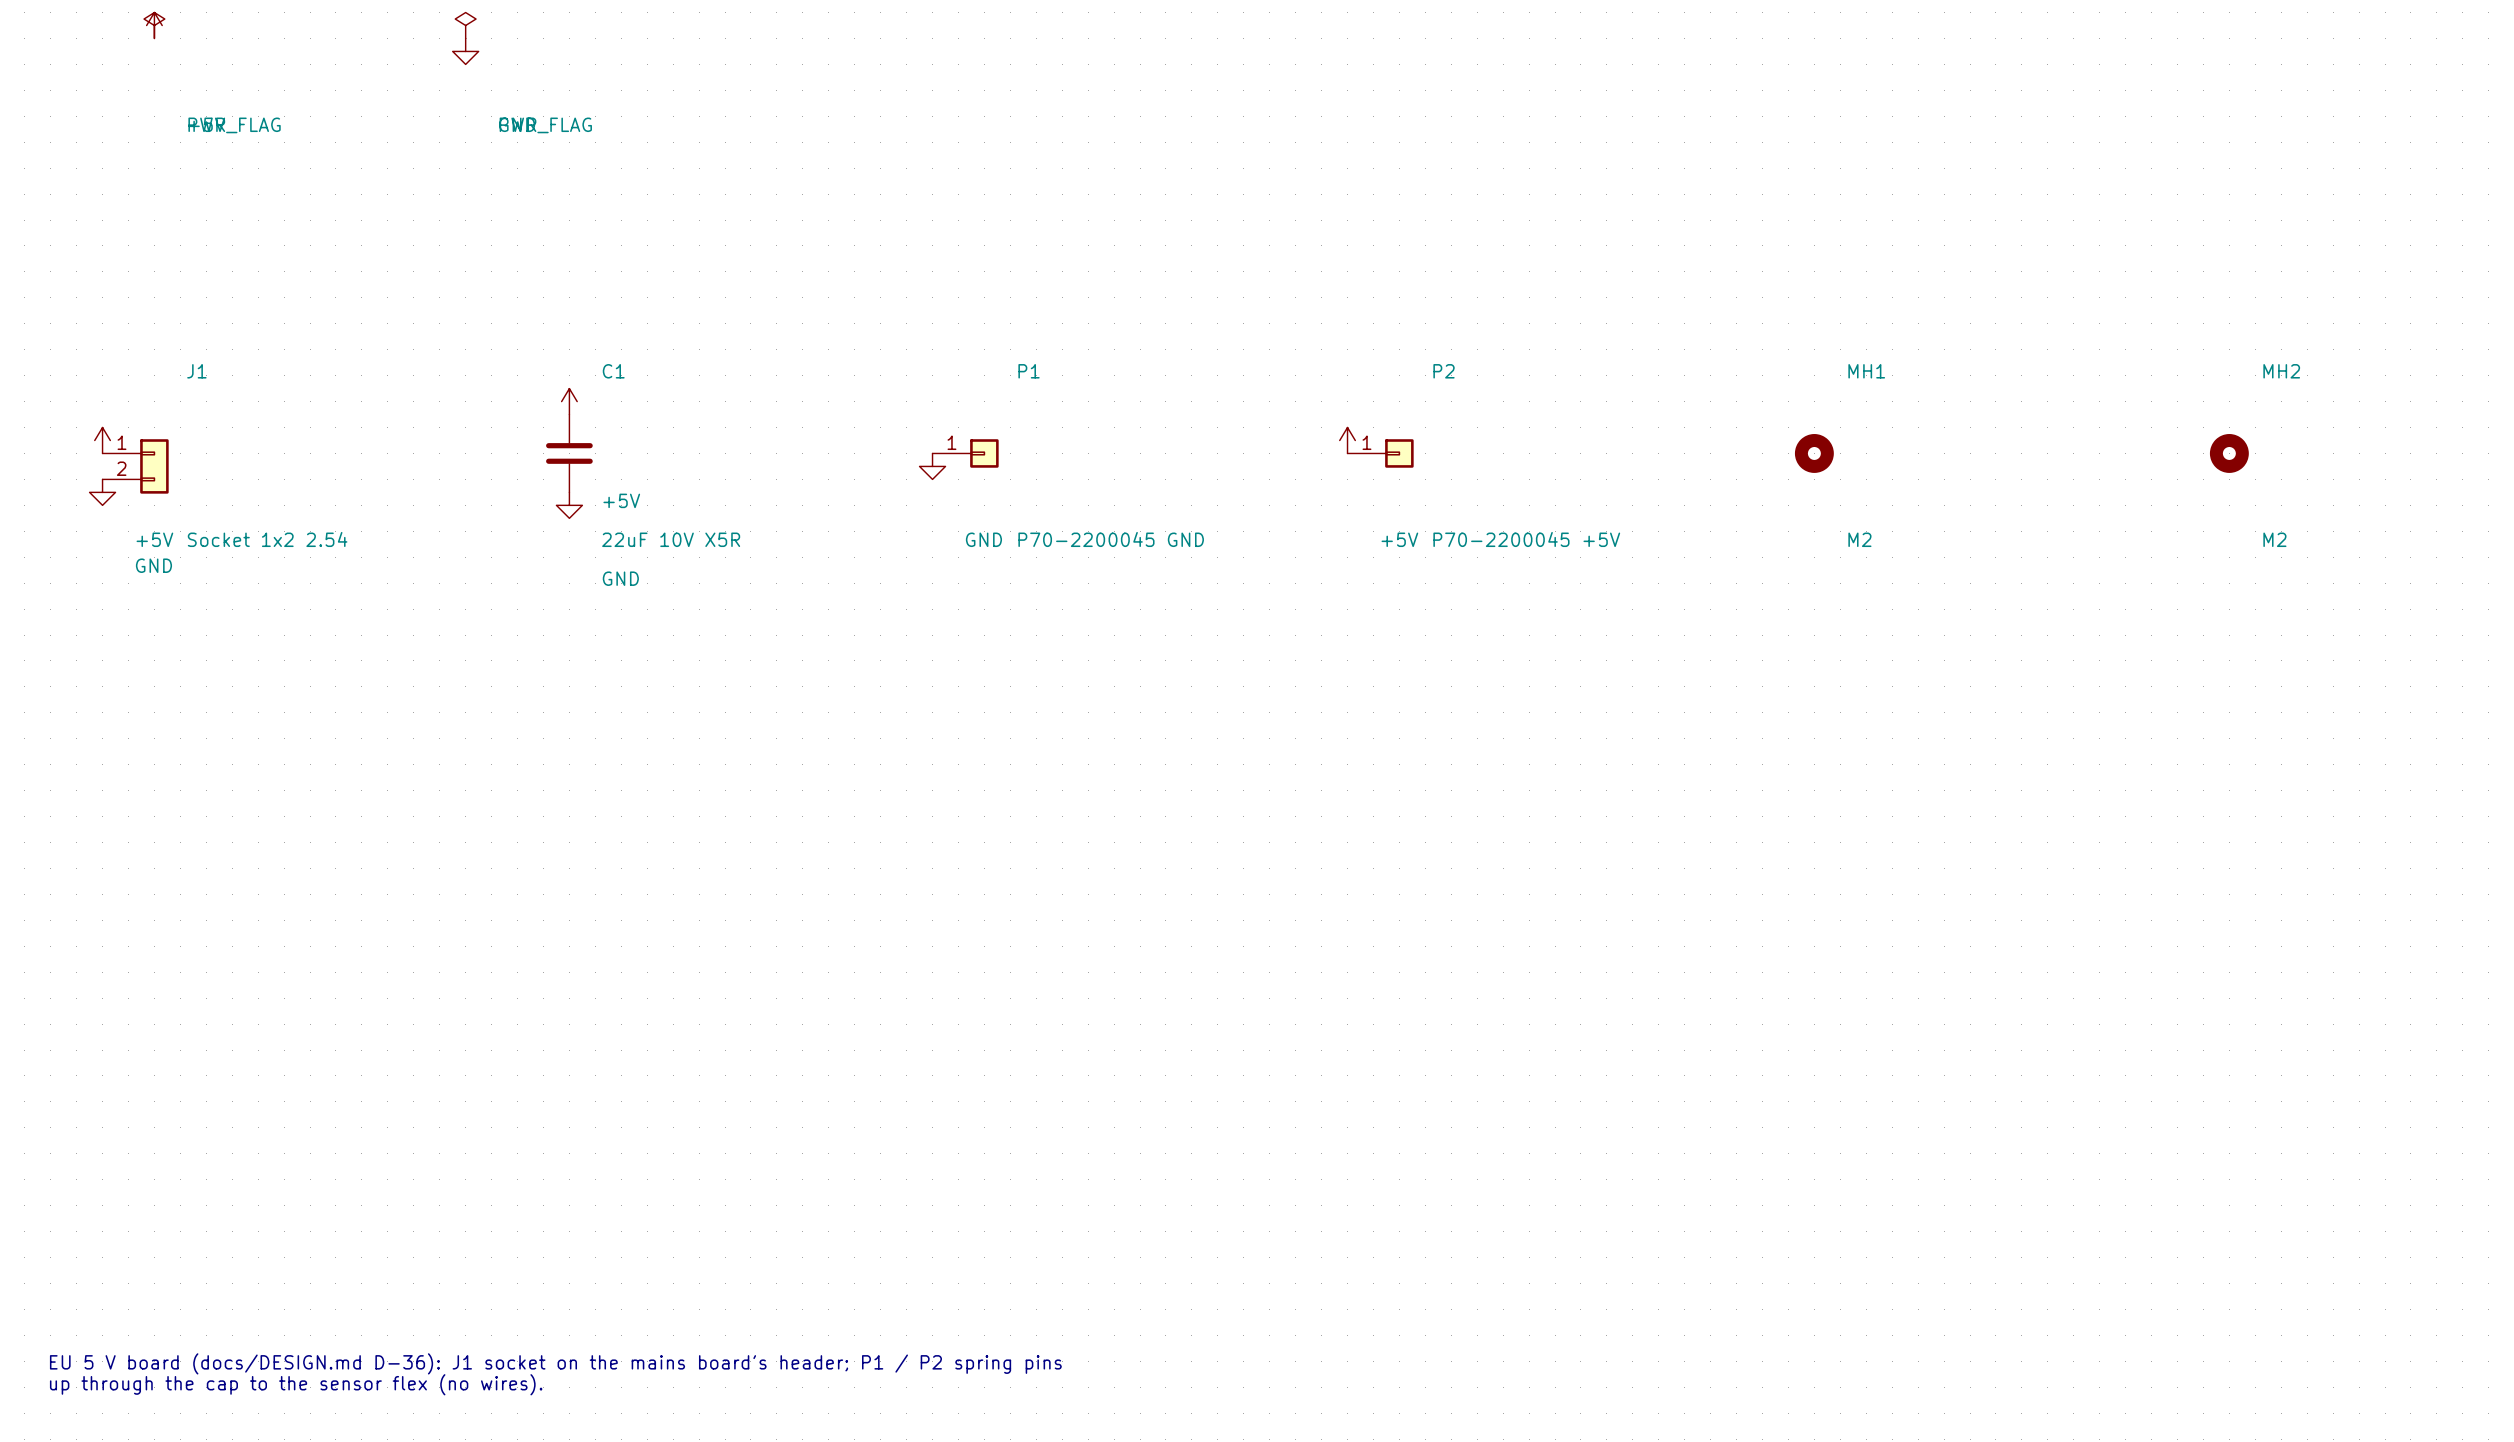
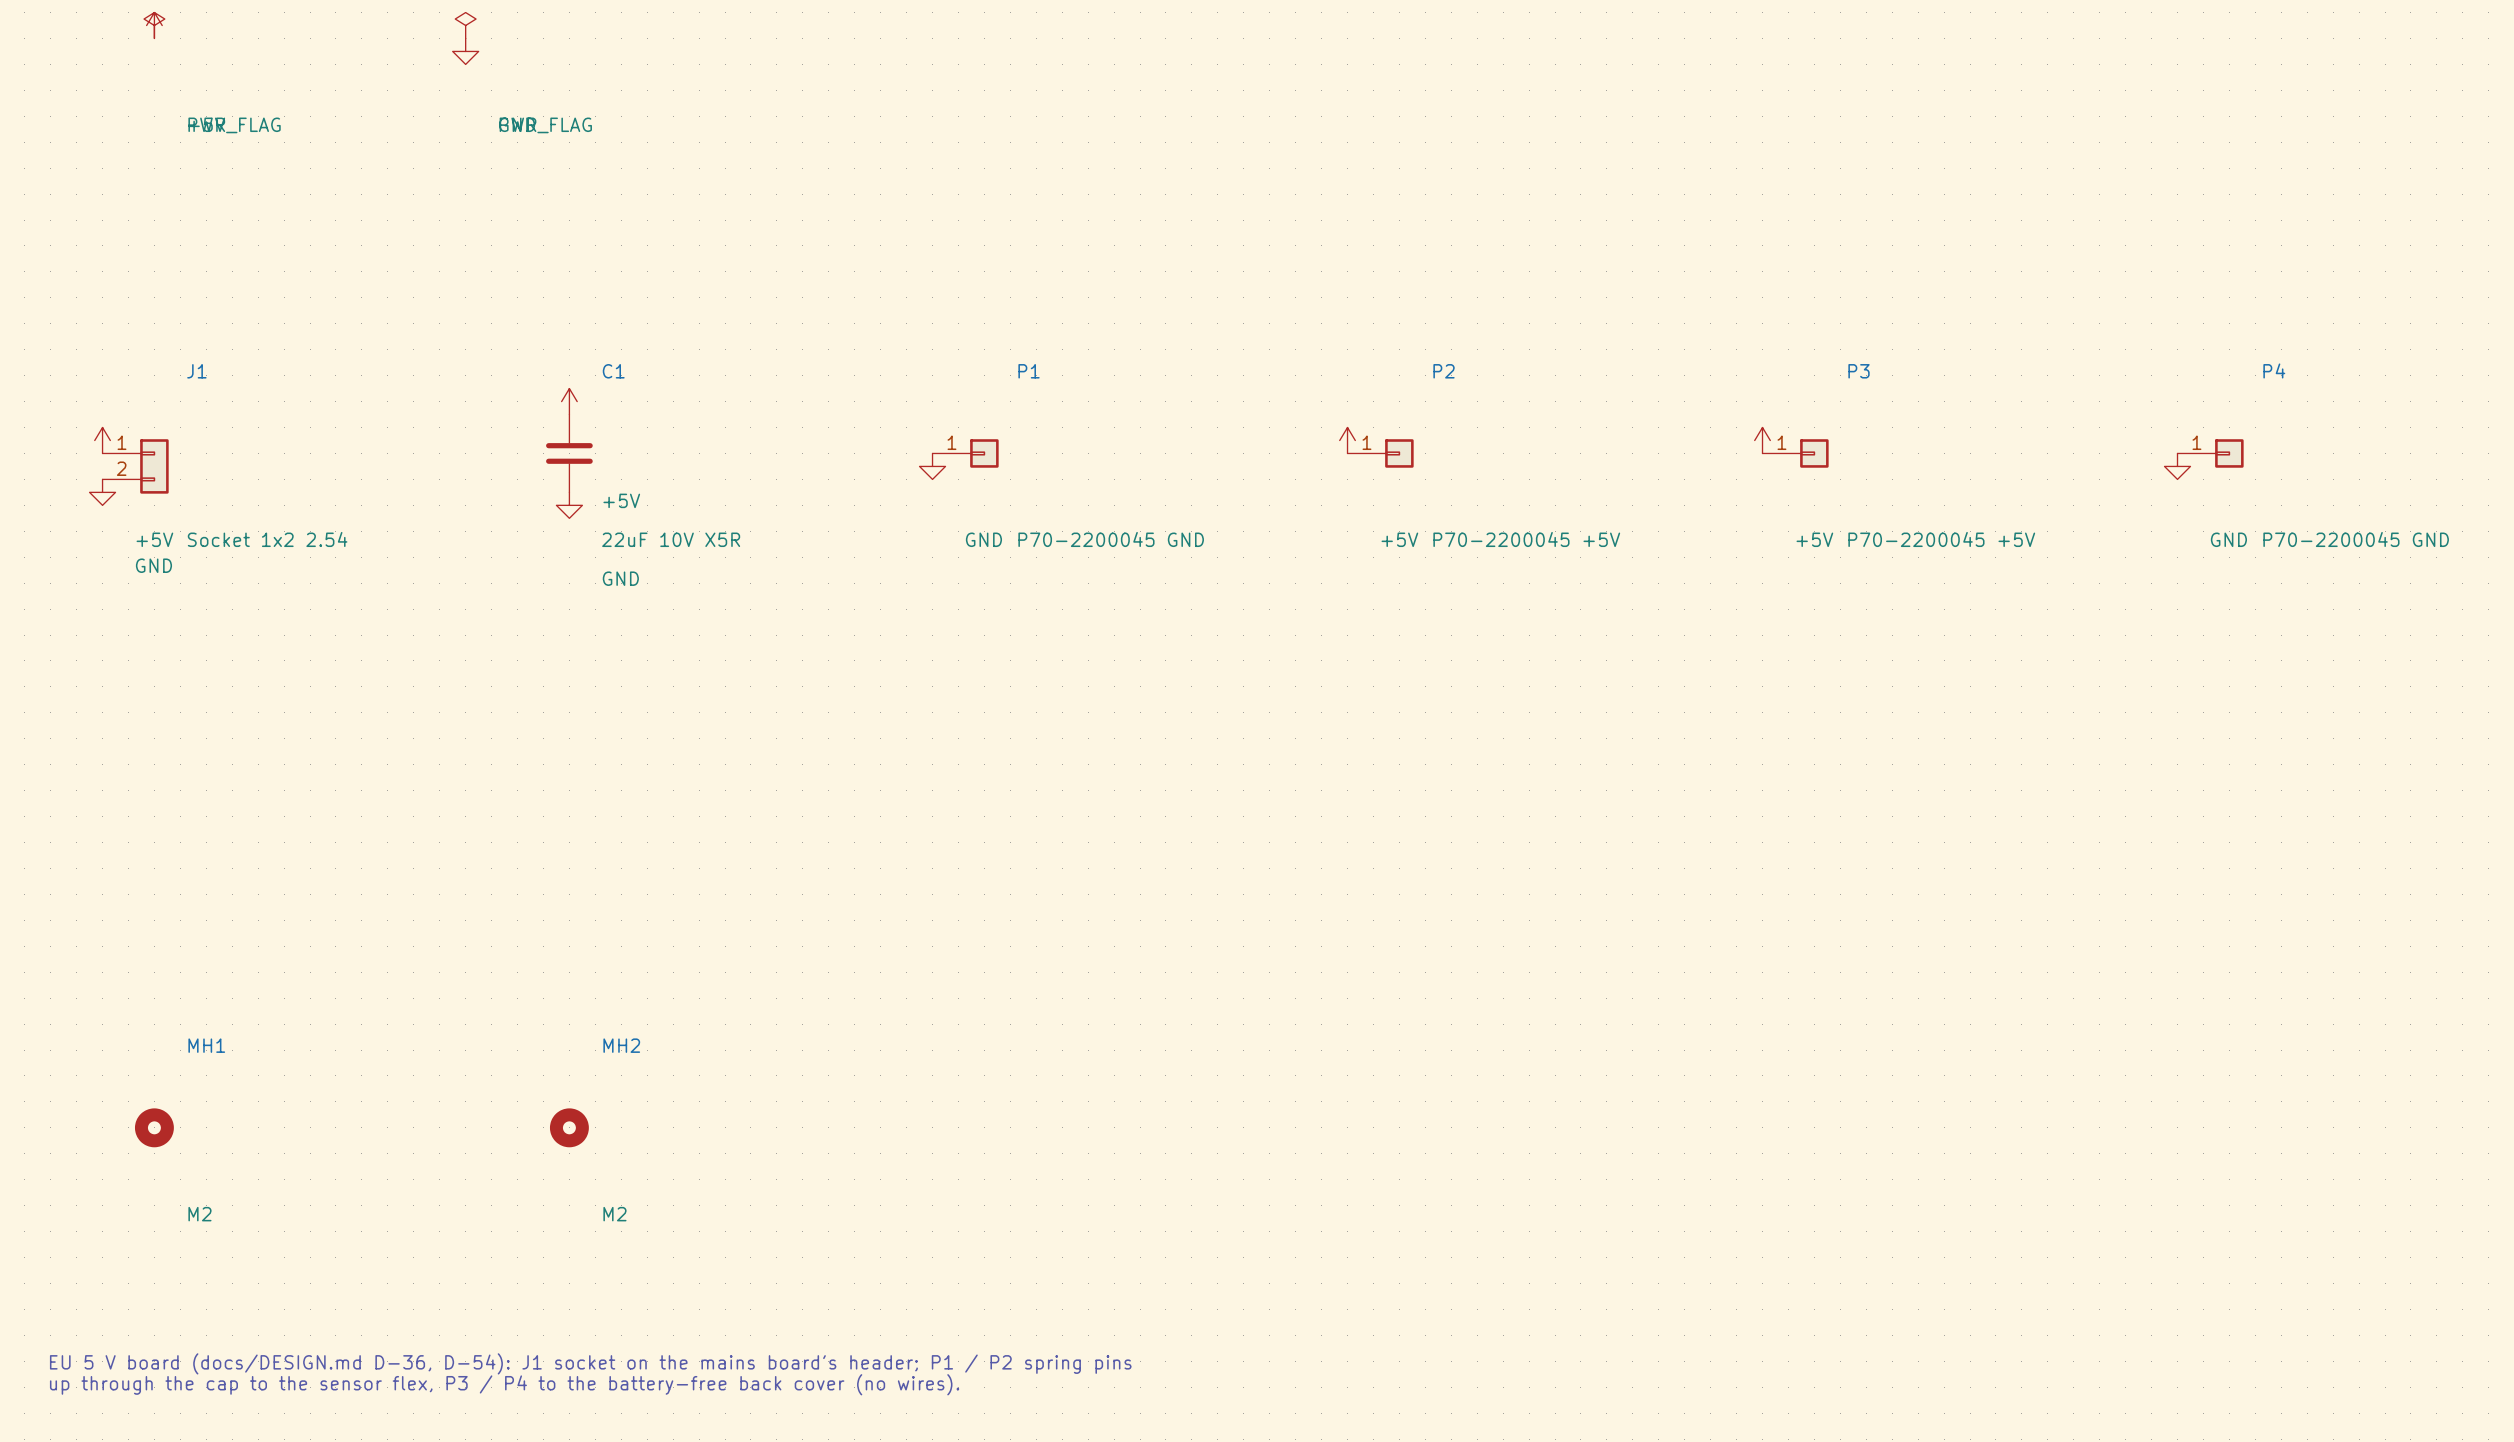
power symbol: none -> +5V (1762, 440)
P3: none -> P70-2200045 +5V (1795, 453)
MH1 position: (1814, 453) -> (154, 1127)
P4: none -> P70-2200045 GND (2210, 453)
MH2 position: (2229, 453) -> (569, 1127)
power symbol: none -> GND (2177, 466)
text: EU 5 V board (docs/DESIGN.md D-36): J1 socket on the mains board's header; P1 / P2 spring pins (555, 1363) -> EU 5 V board (docs/DESIGN.md D-36, D-54): J1 socket on the mains board's header; P1 / P2 spring pins (590, 1363)
text: up through the cap to the sensor flex (no wires). (296, 1384) -> up through the cap to the sensor flex, P3 / P4 to the battery-free back cover (no wires). (504, 1384)

